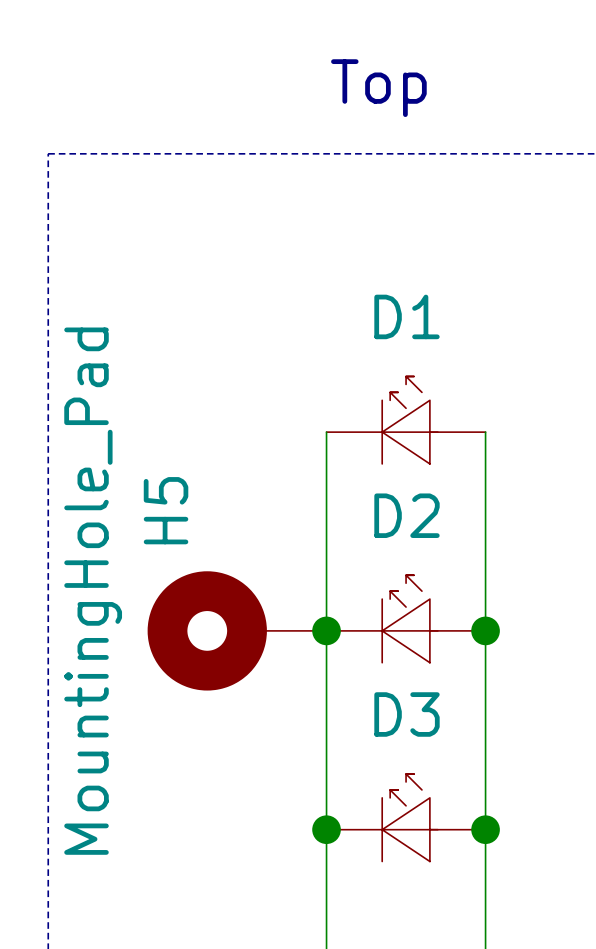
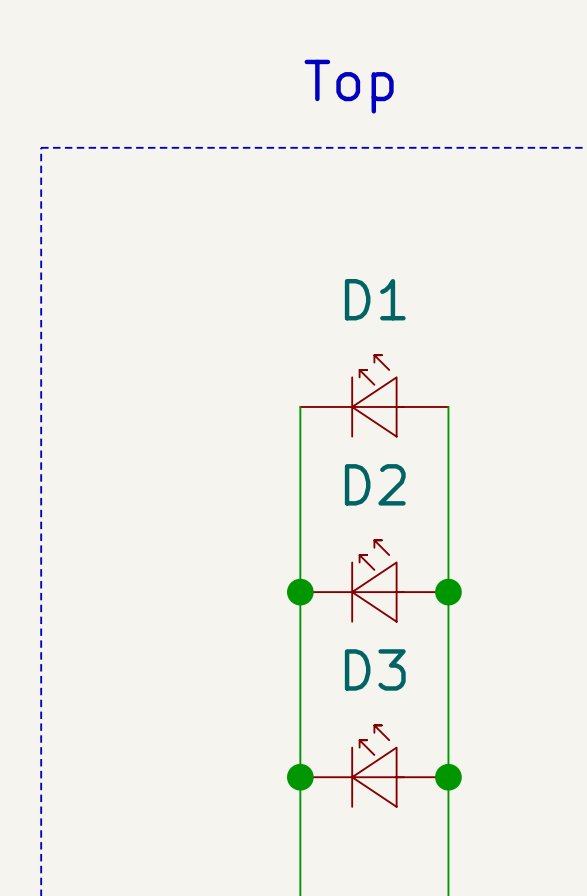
H5: MountingHole_Pad (237, 630) -> none

